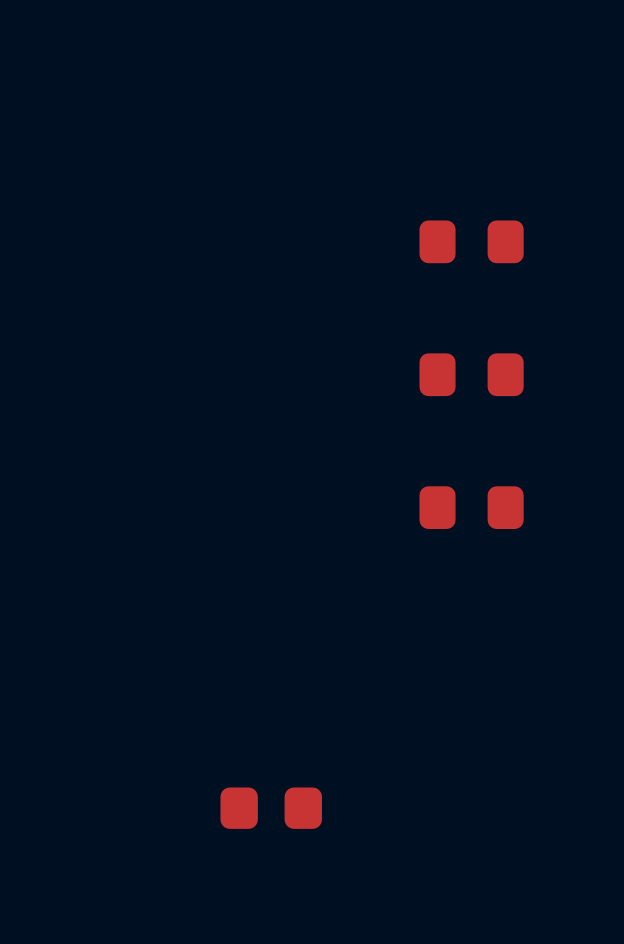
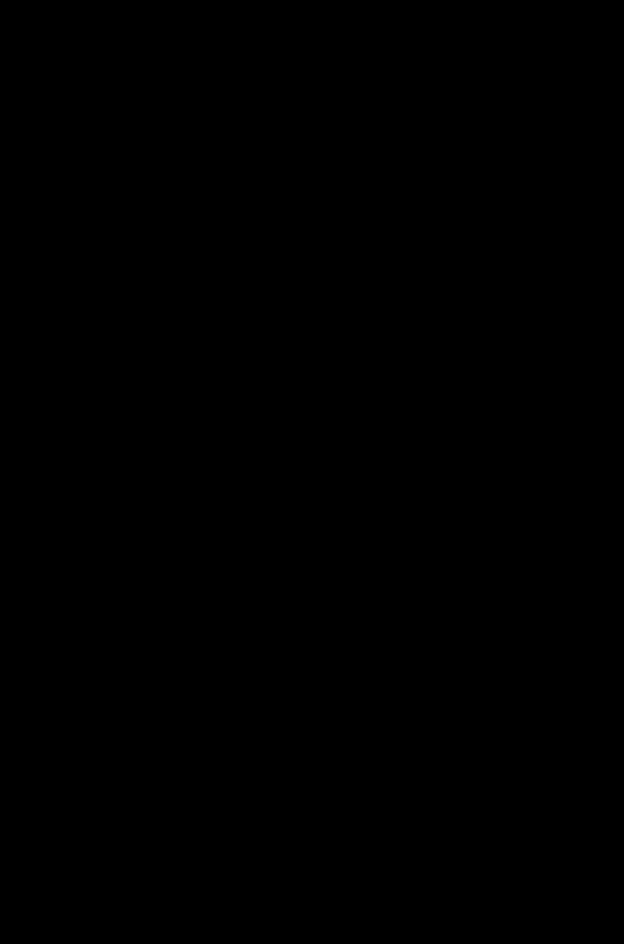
part: (471, 241) -> none
part: (471, 374) -> none
part: (471, 507) -> none
part: (271, 808) -> none

